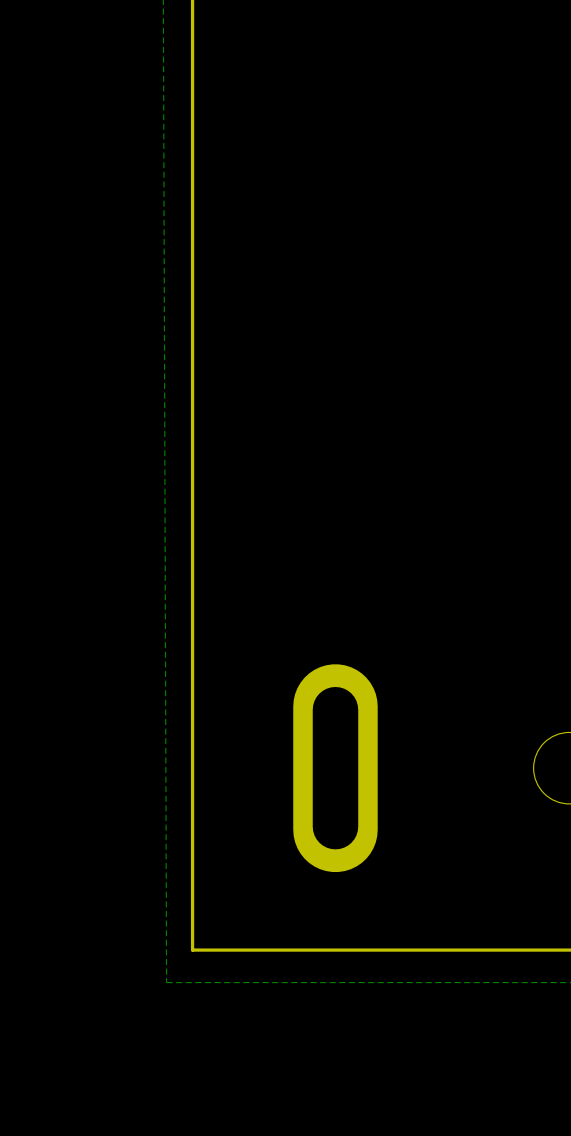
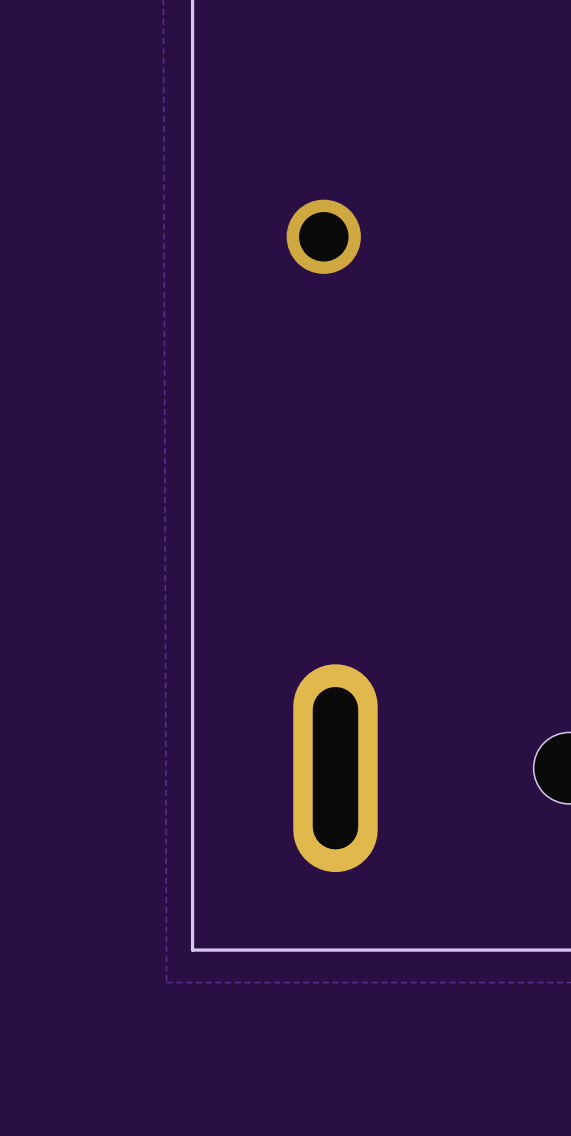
via: none -> (323, 236)

